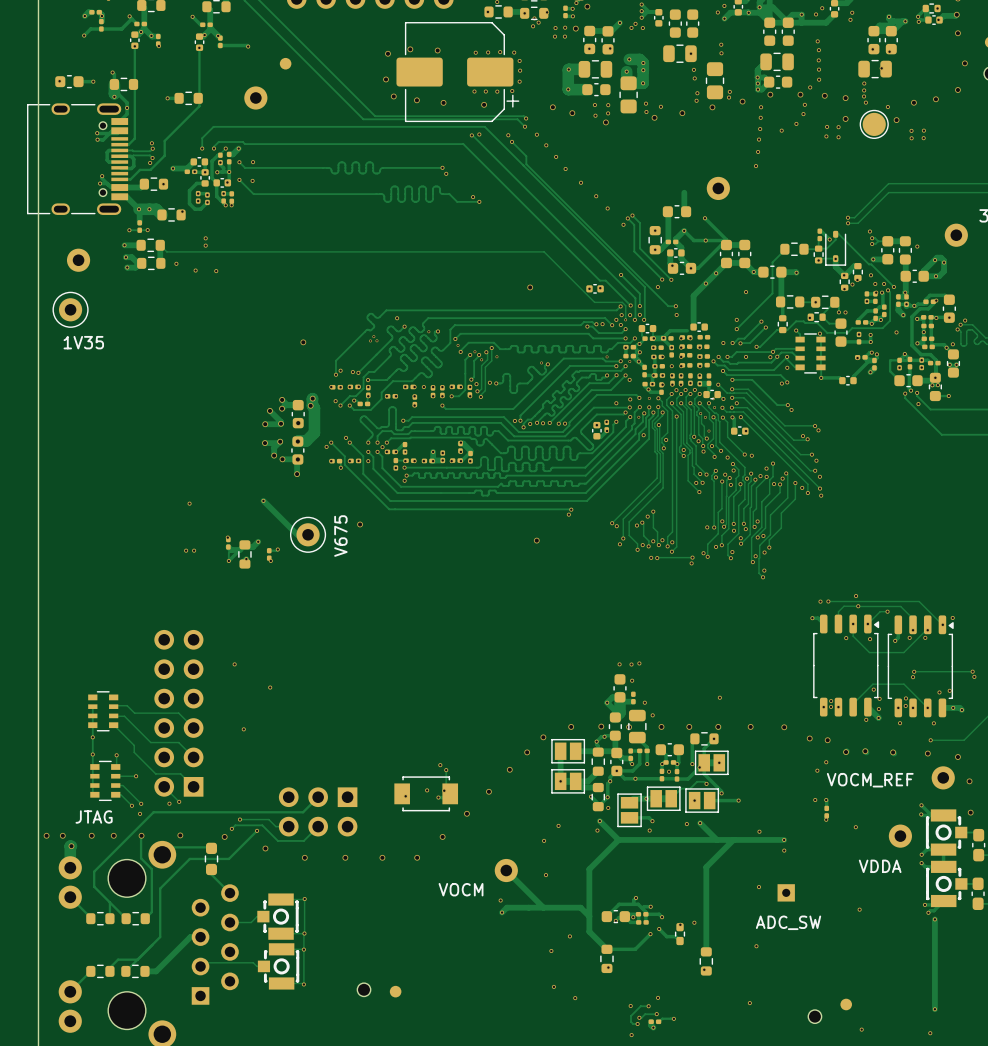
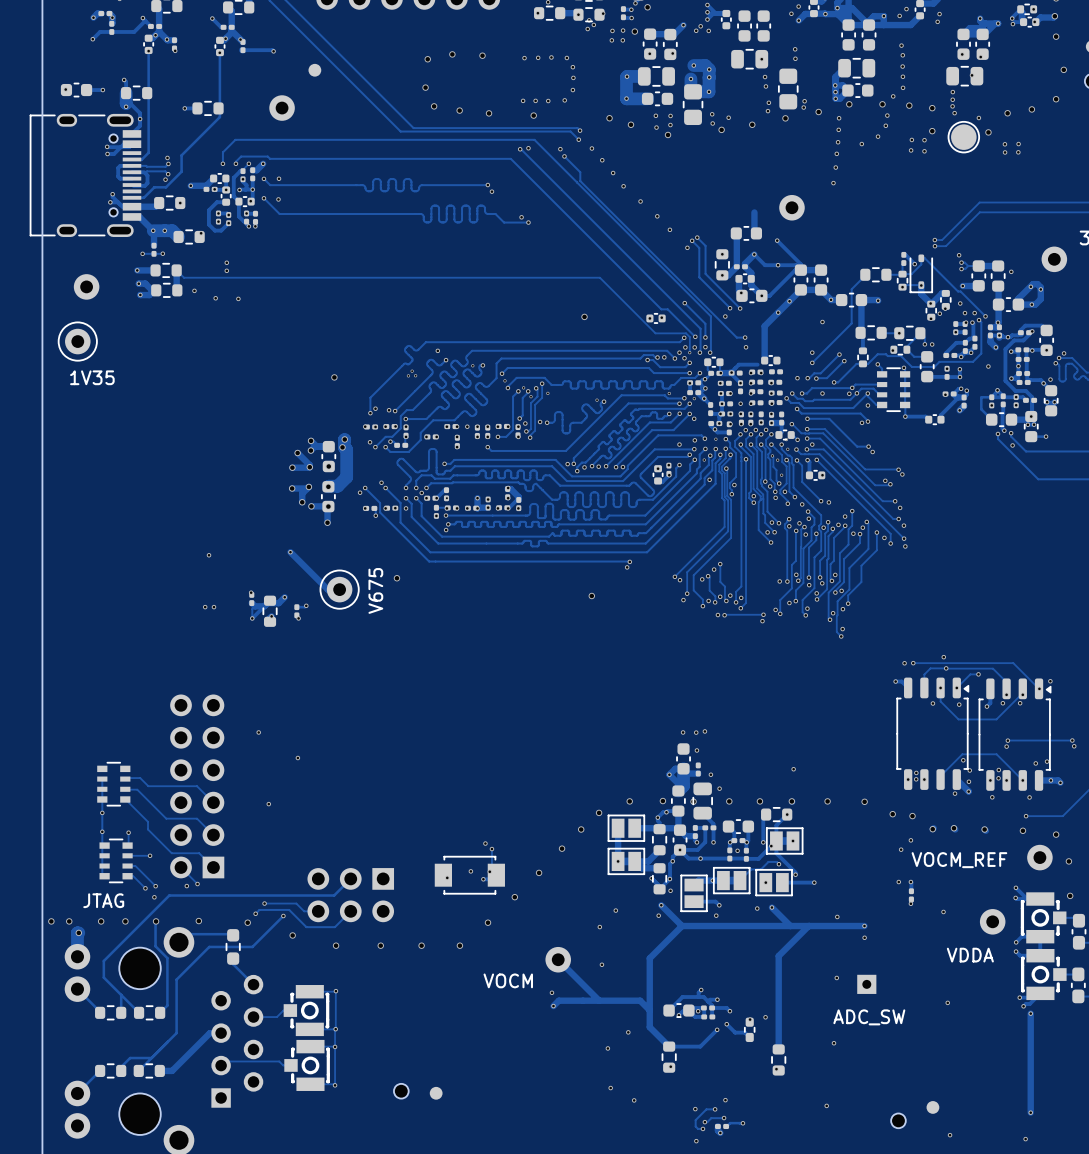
part: (457, 72) -> none

